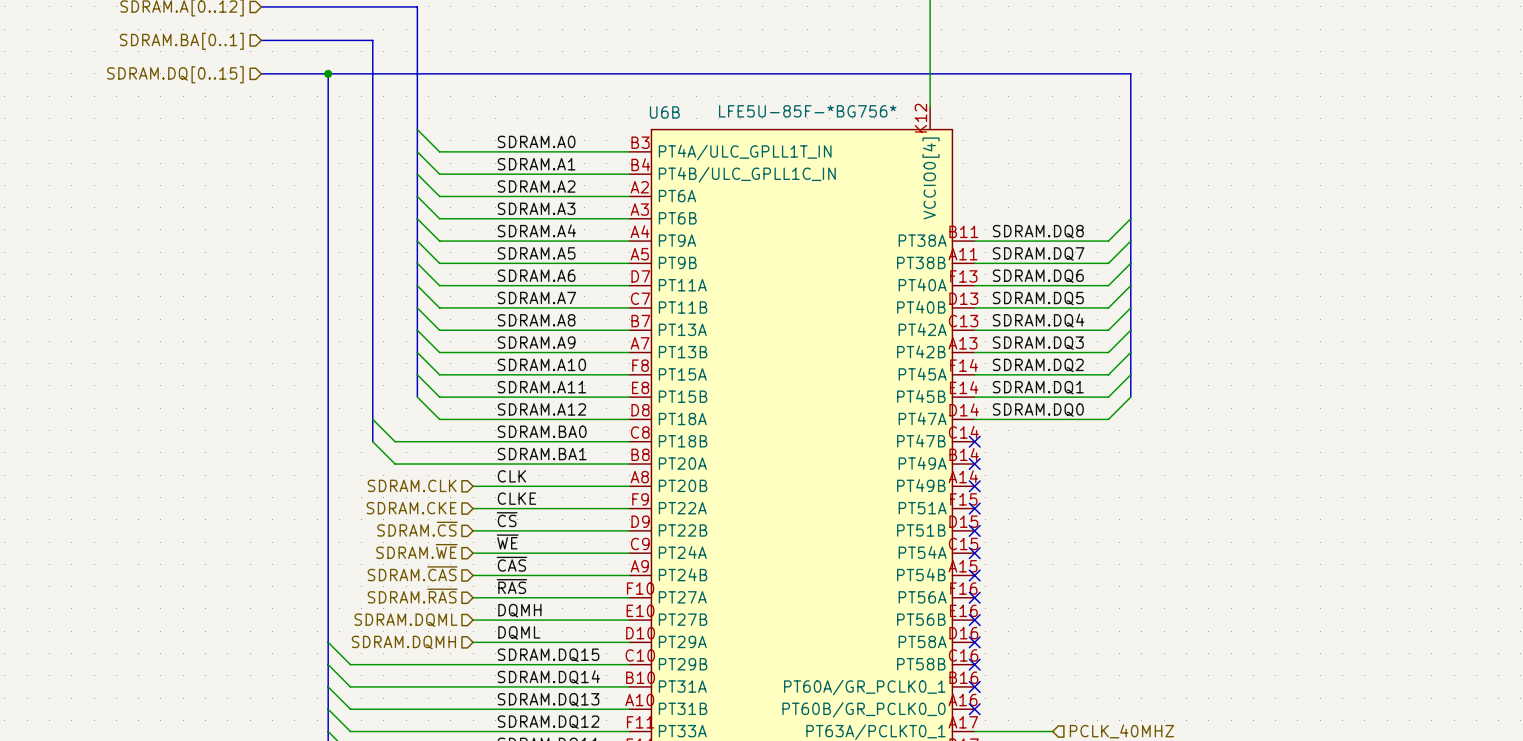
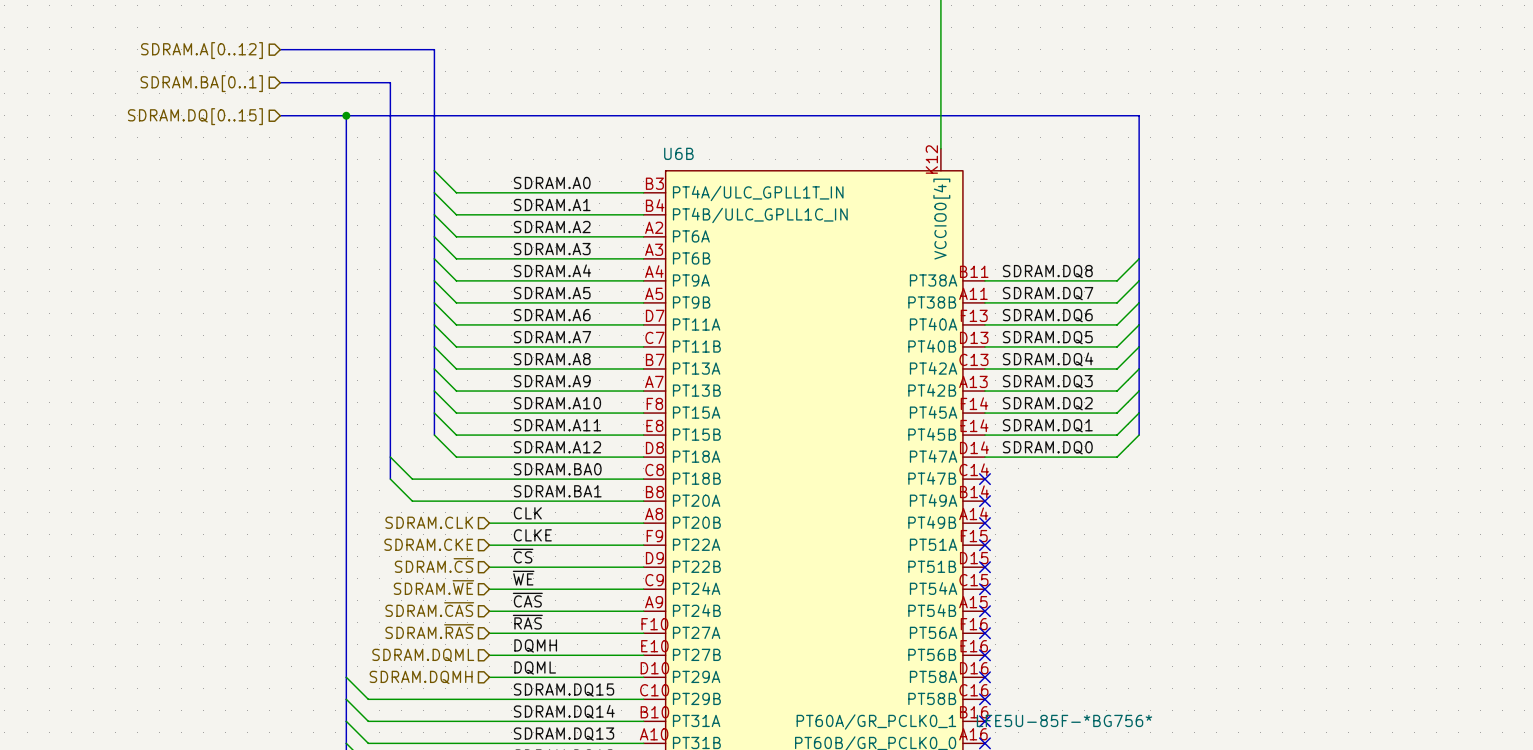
U6B value position: LFE5U-85F-*BG756* (807, 111) -> LFE5U-85F-*BG756* (1064, 720)

